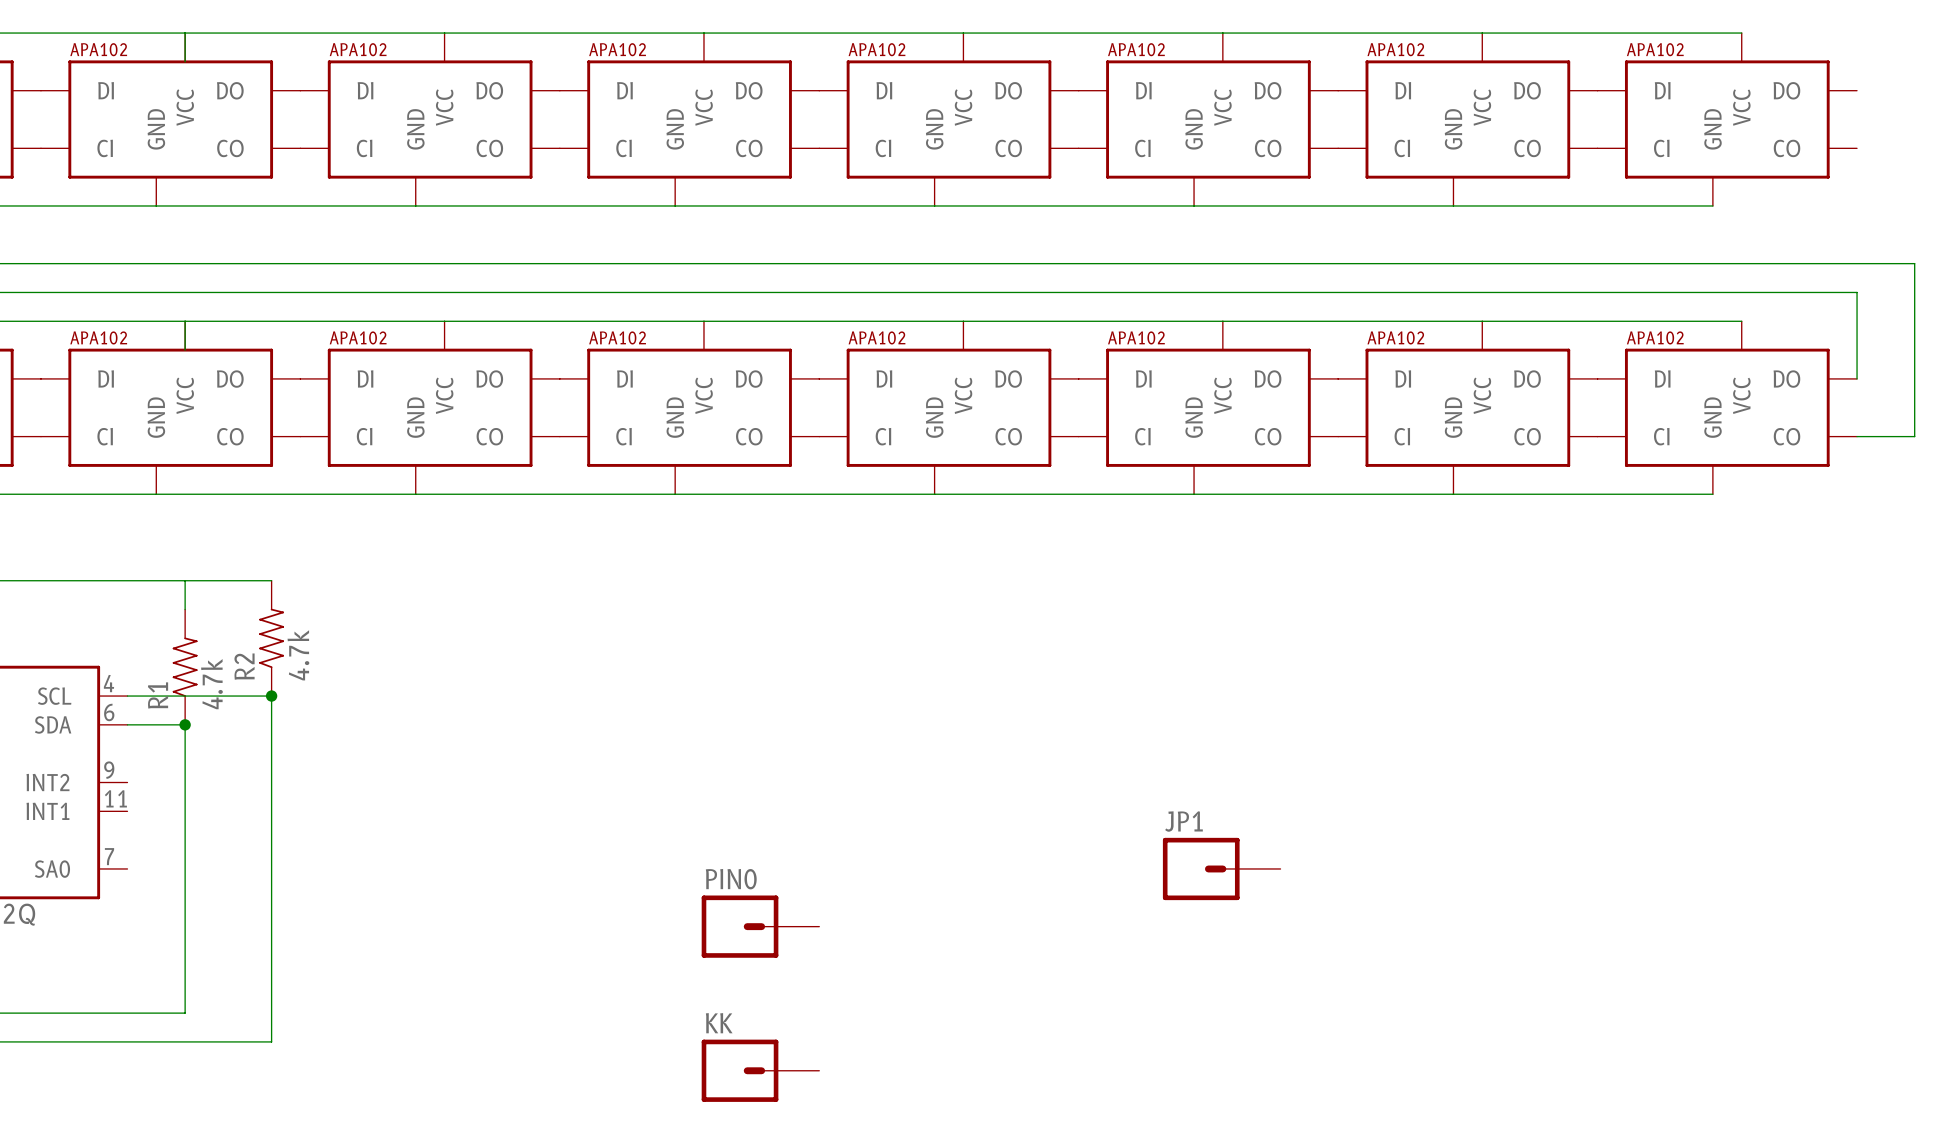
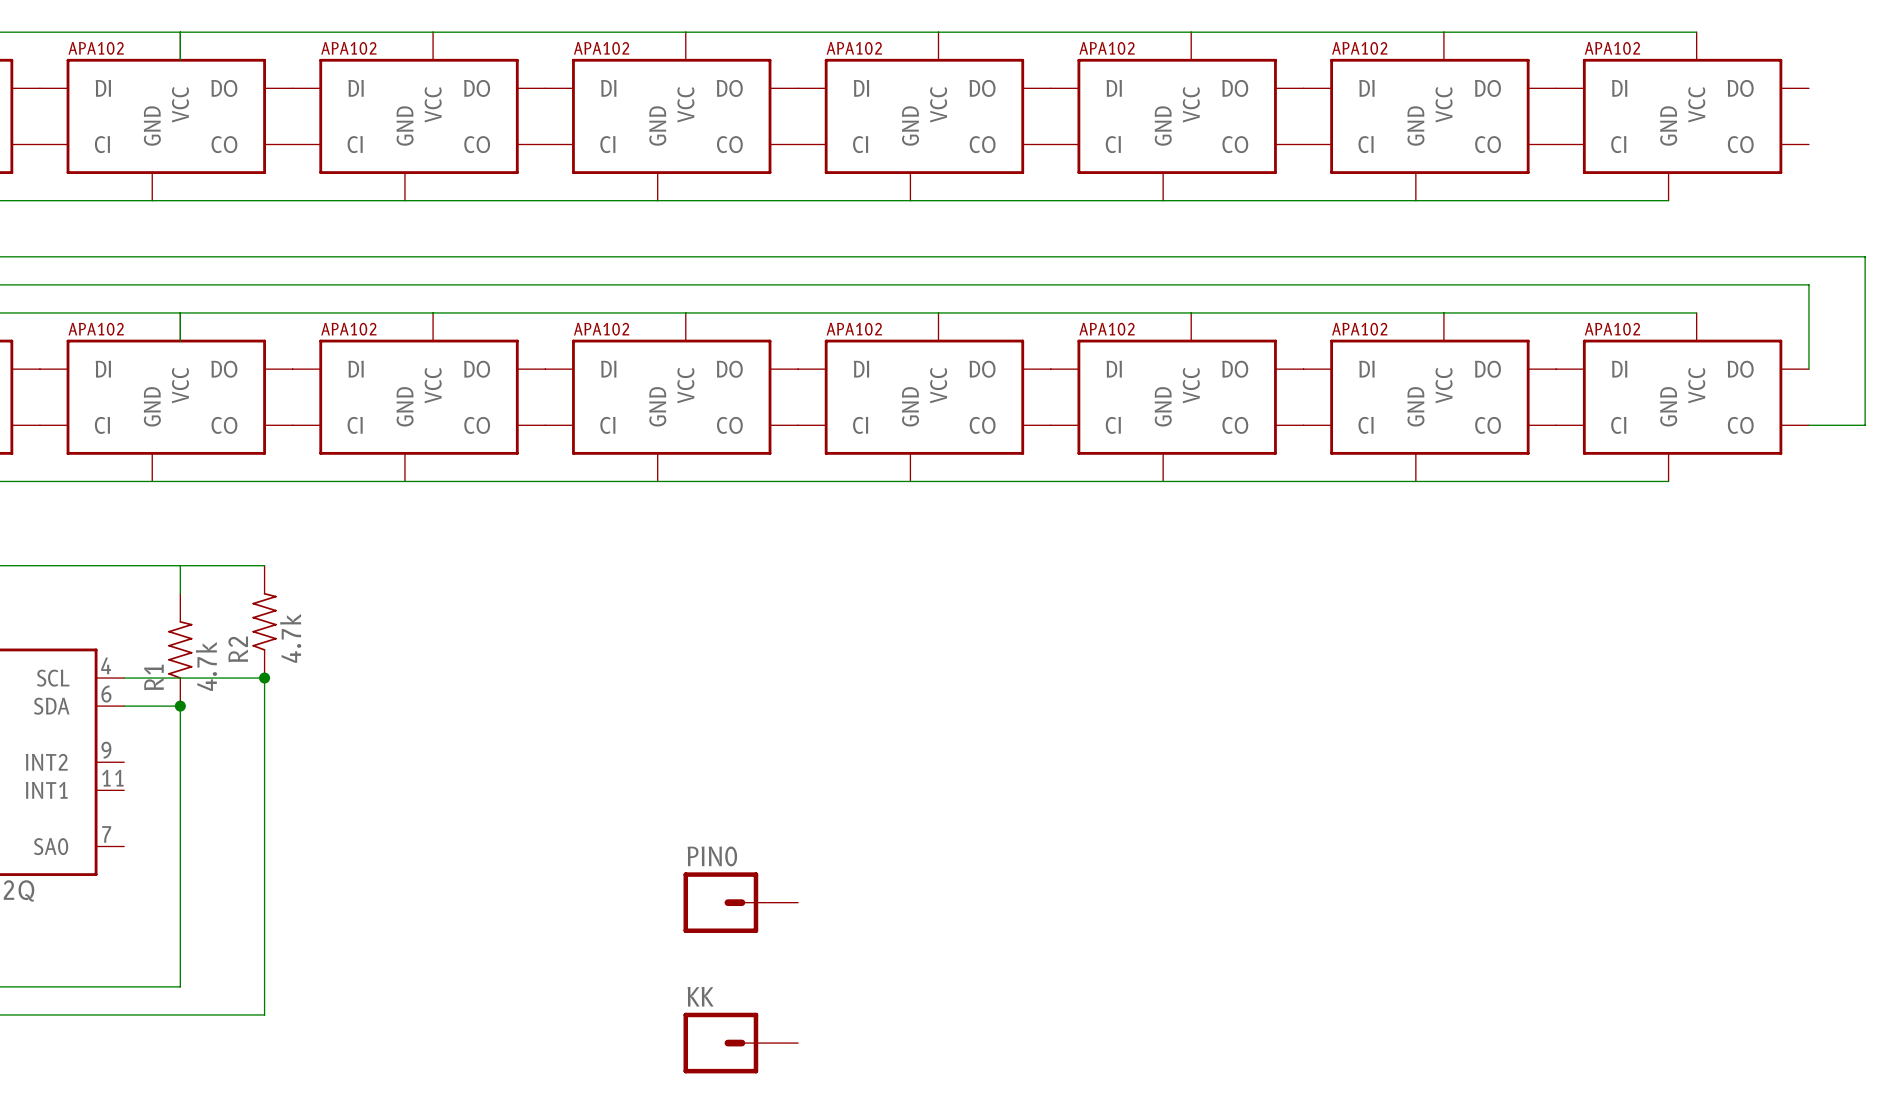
JP1: (1221, 868) -> none

